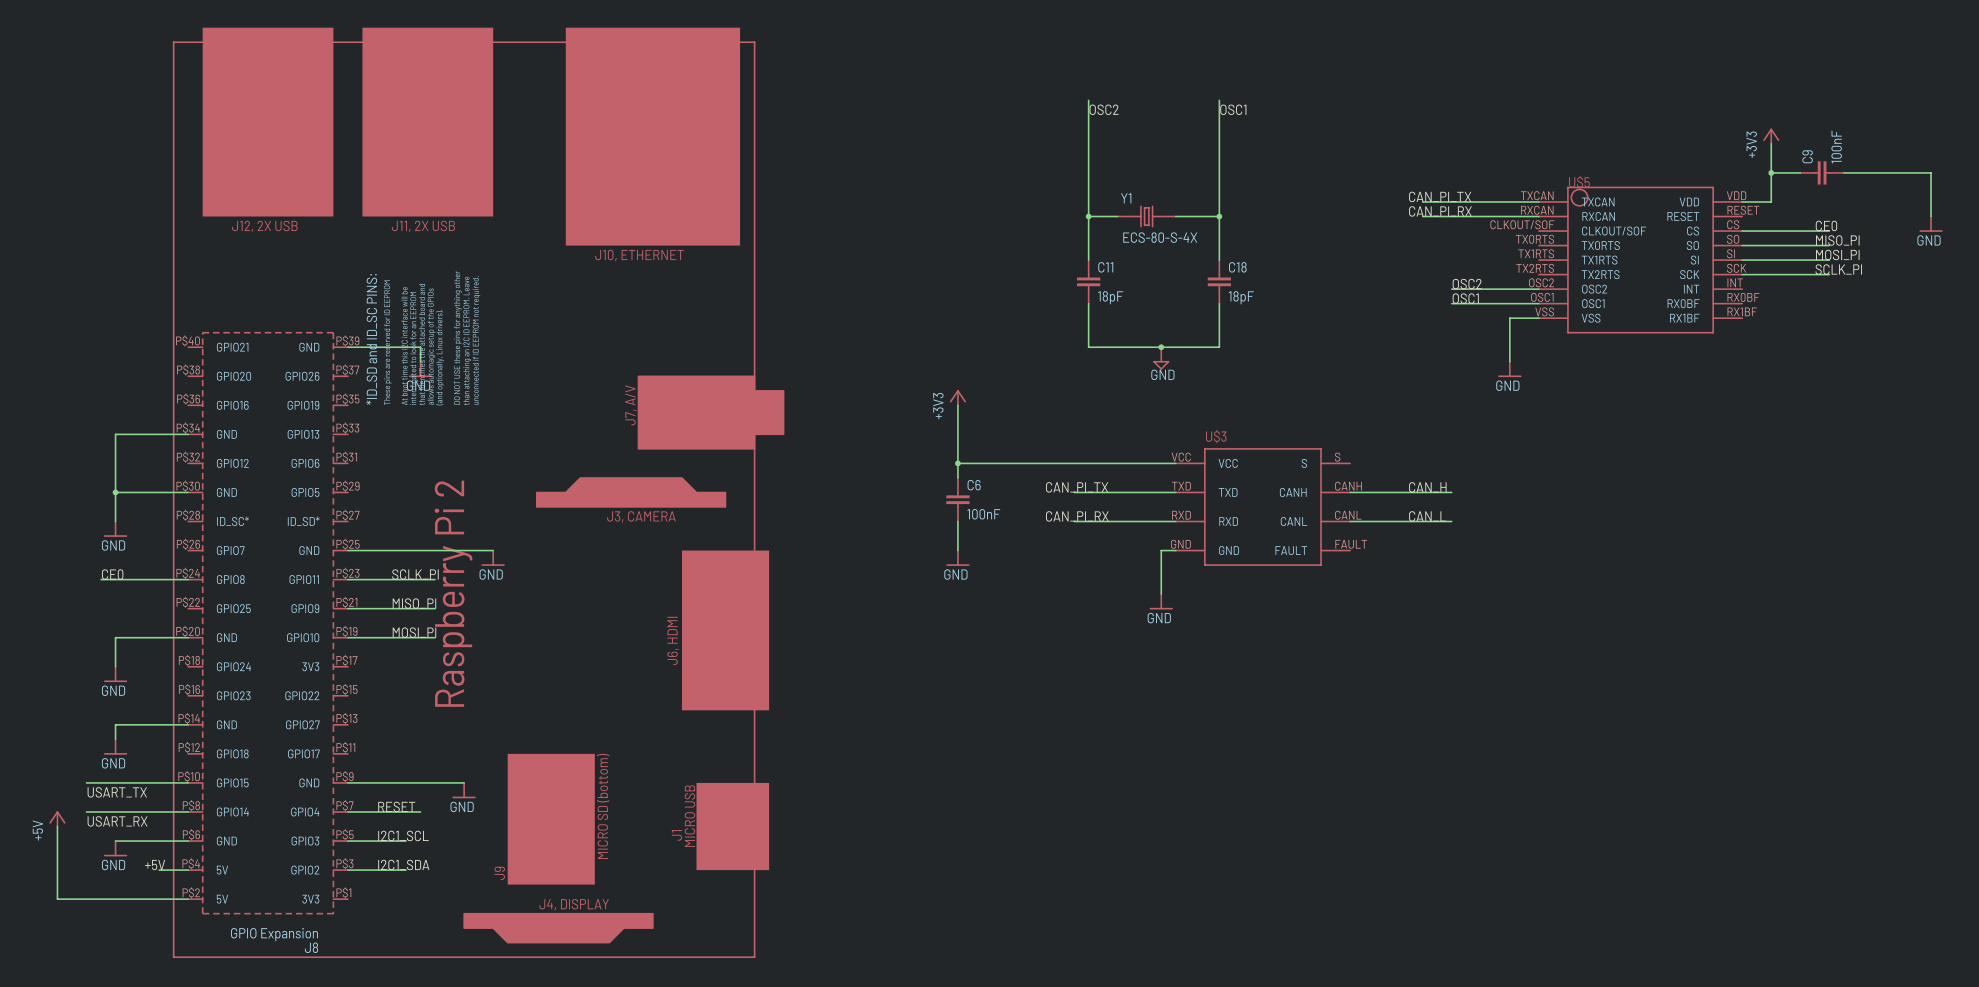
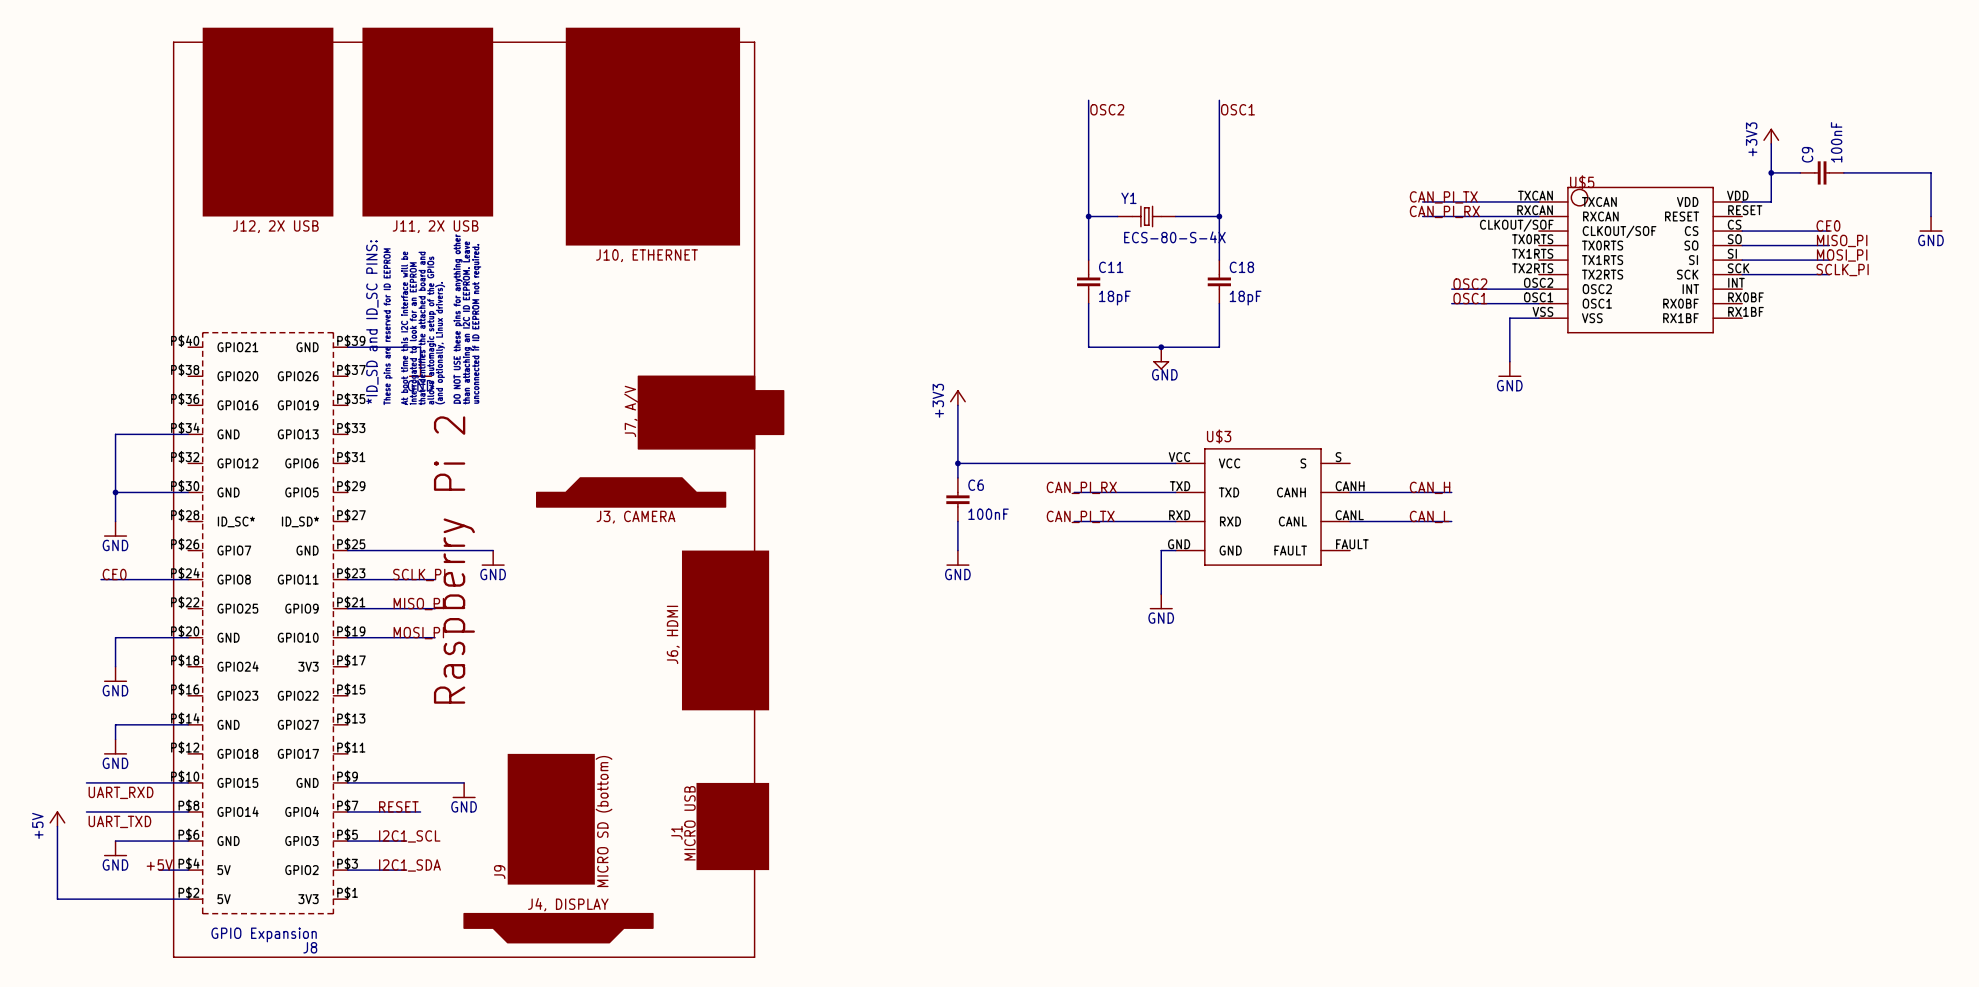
label: CAN_PI_TX (1077, 487) -> CAN_PI_RX (1081, 487)
label: CAN_PI_RX (1077, 516) -> CAN_PI_TX (1080, 516)
label: USART_TX (117, 792) -> UART_RXD (121, 792)
label: USART_RX (117, 821) -> UART_TXD (119, 821)

